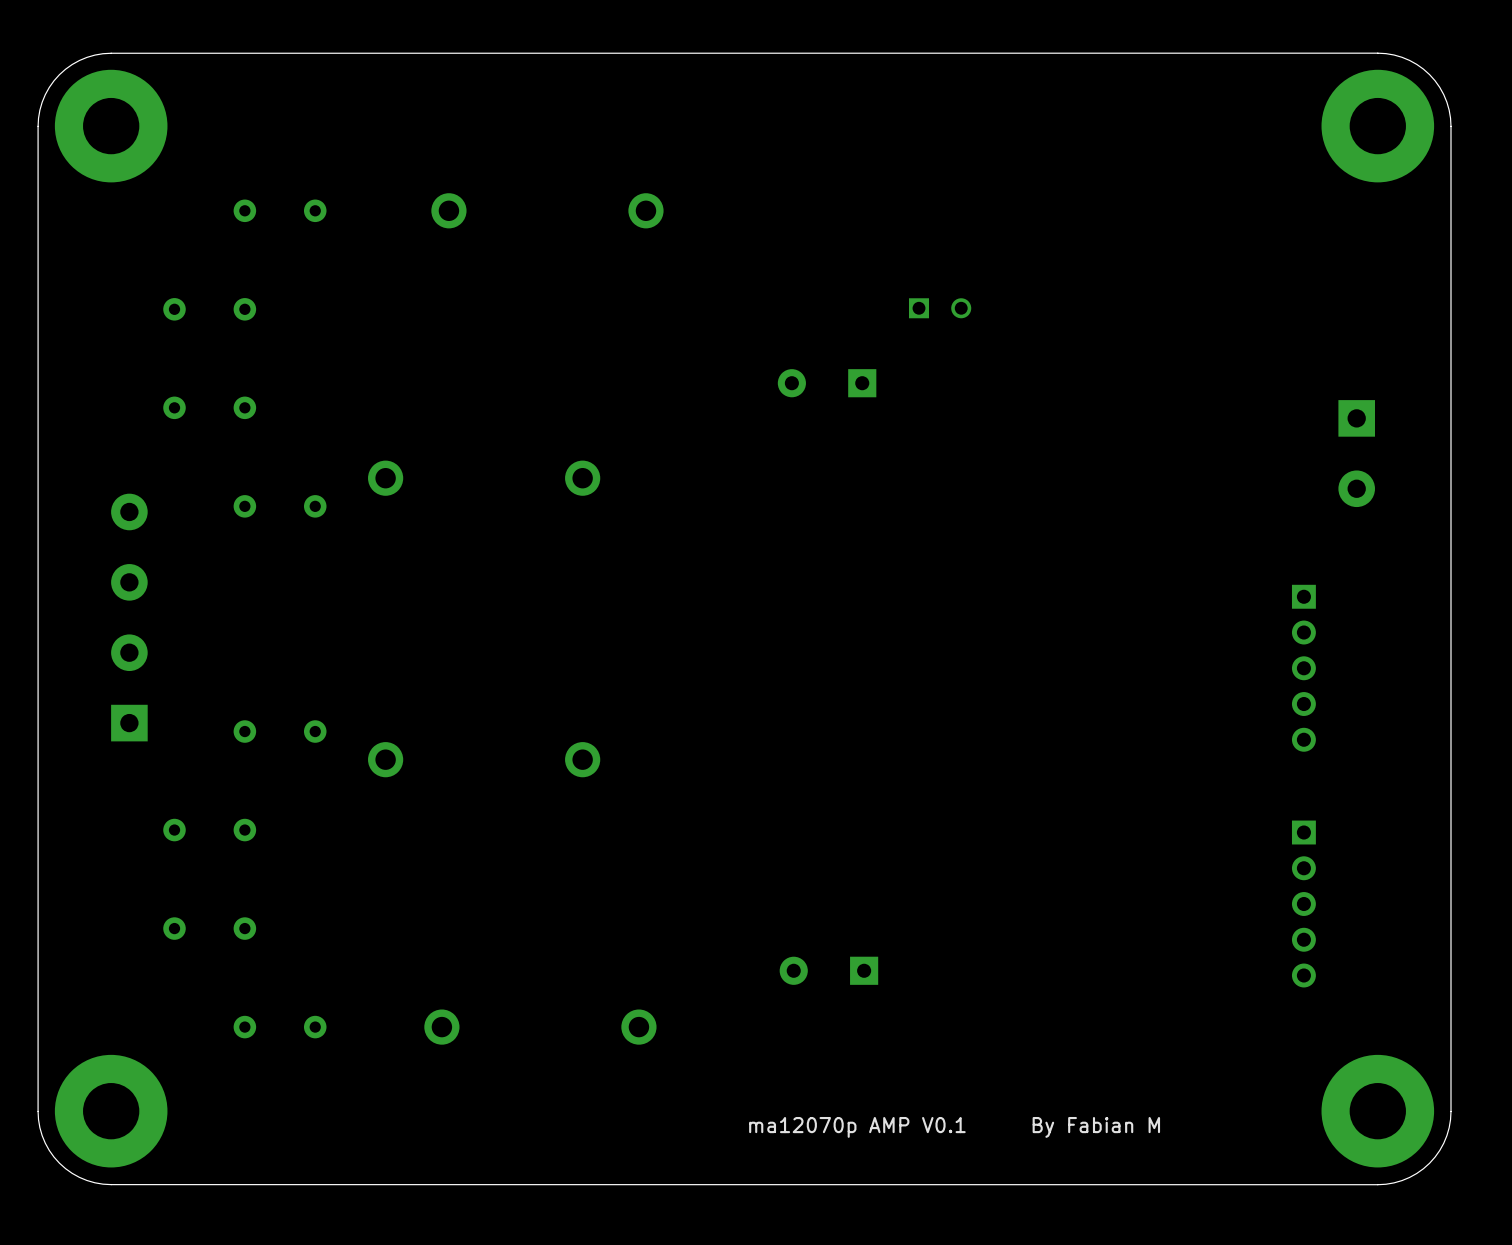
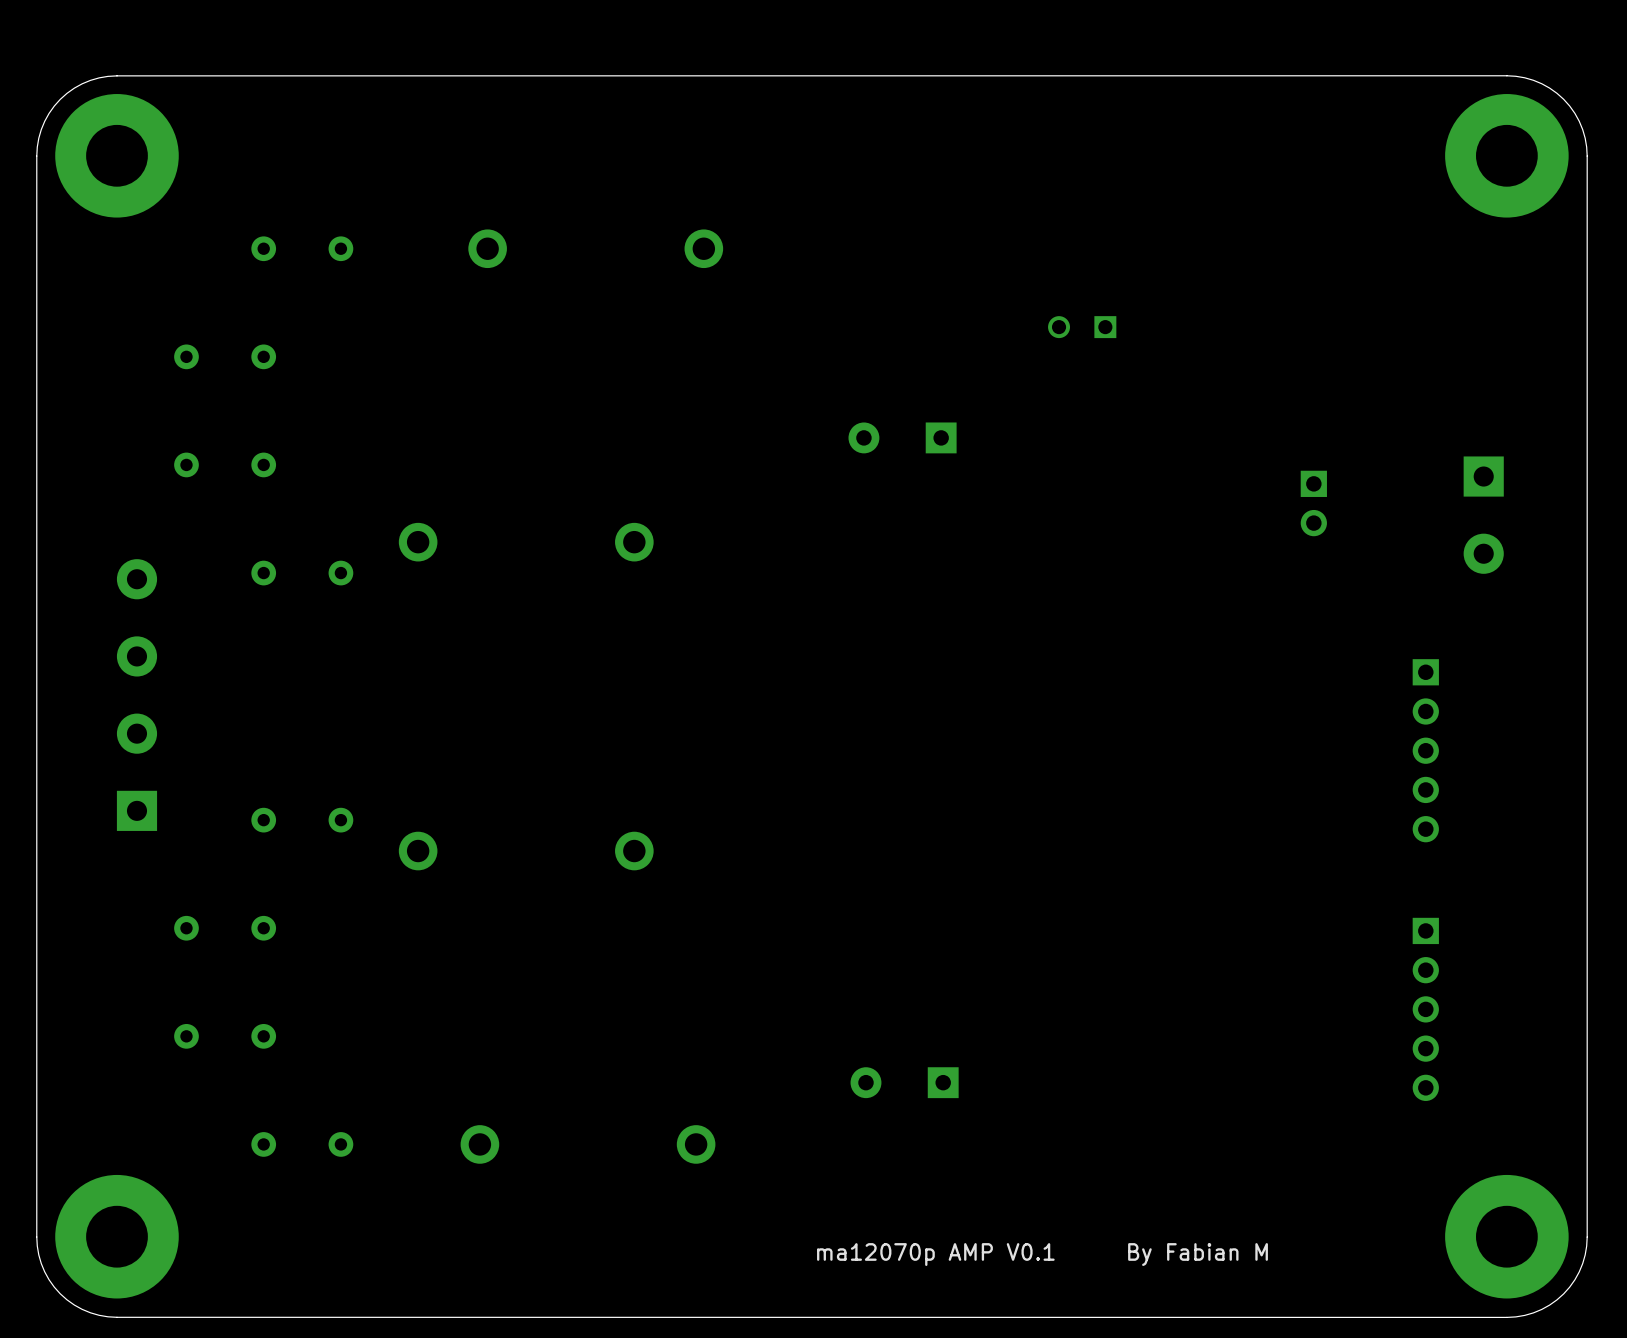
part rotation: 0° (940, 308) -> 180° (1082, 327)
part position: (940, 308) -> (1082, 327)
part: none -> (1313, 503)

